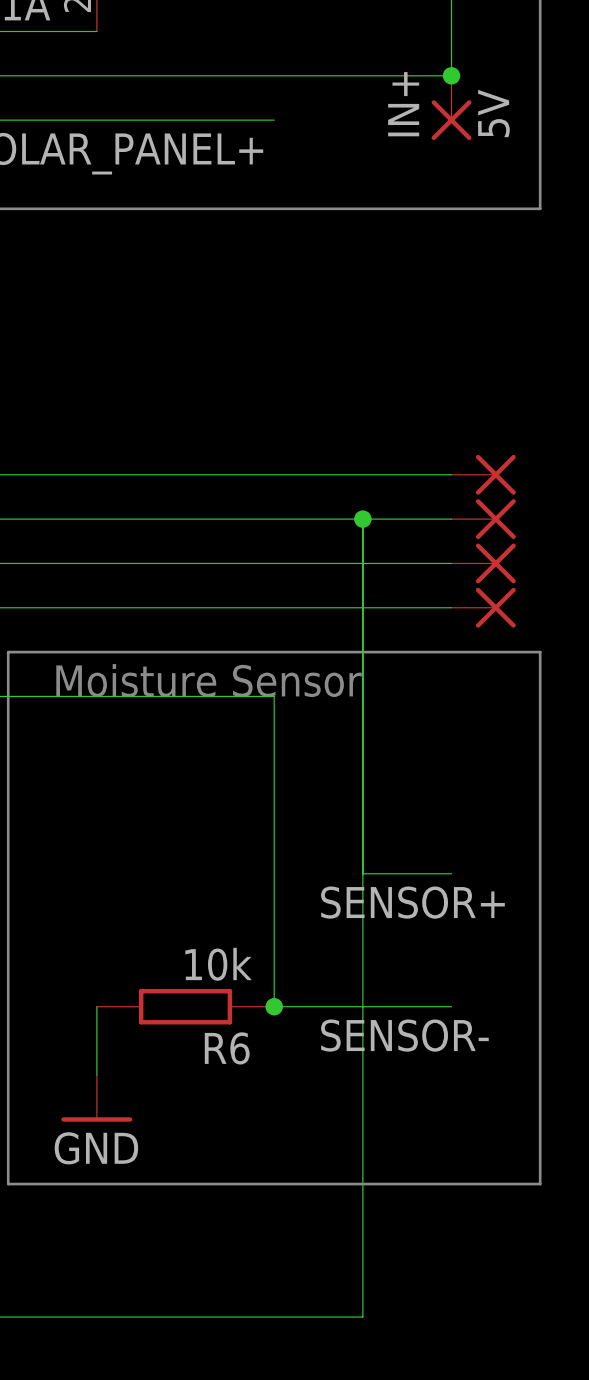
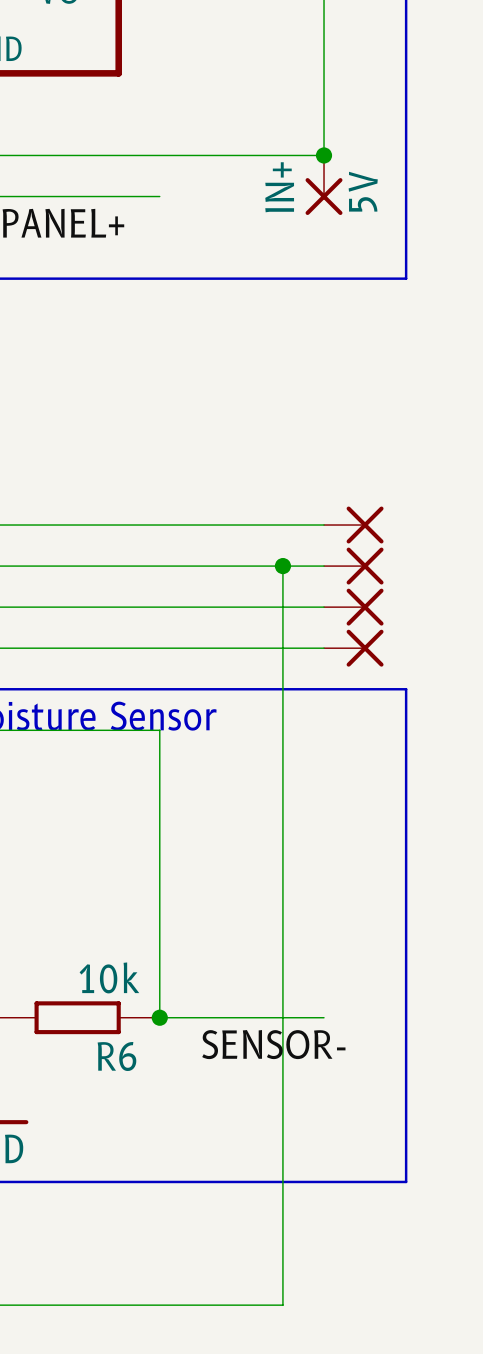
wire: (362, 519) (362, 1317) -> (282, 566) (282, 1305) (241, 1305)
junction position: (362, 519) -> (282, 566)
wire: (362, 873) (451, 873) -> none
label: SENSOR+ (412, 902) -> none

